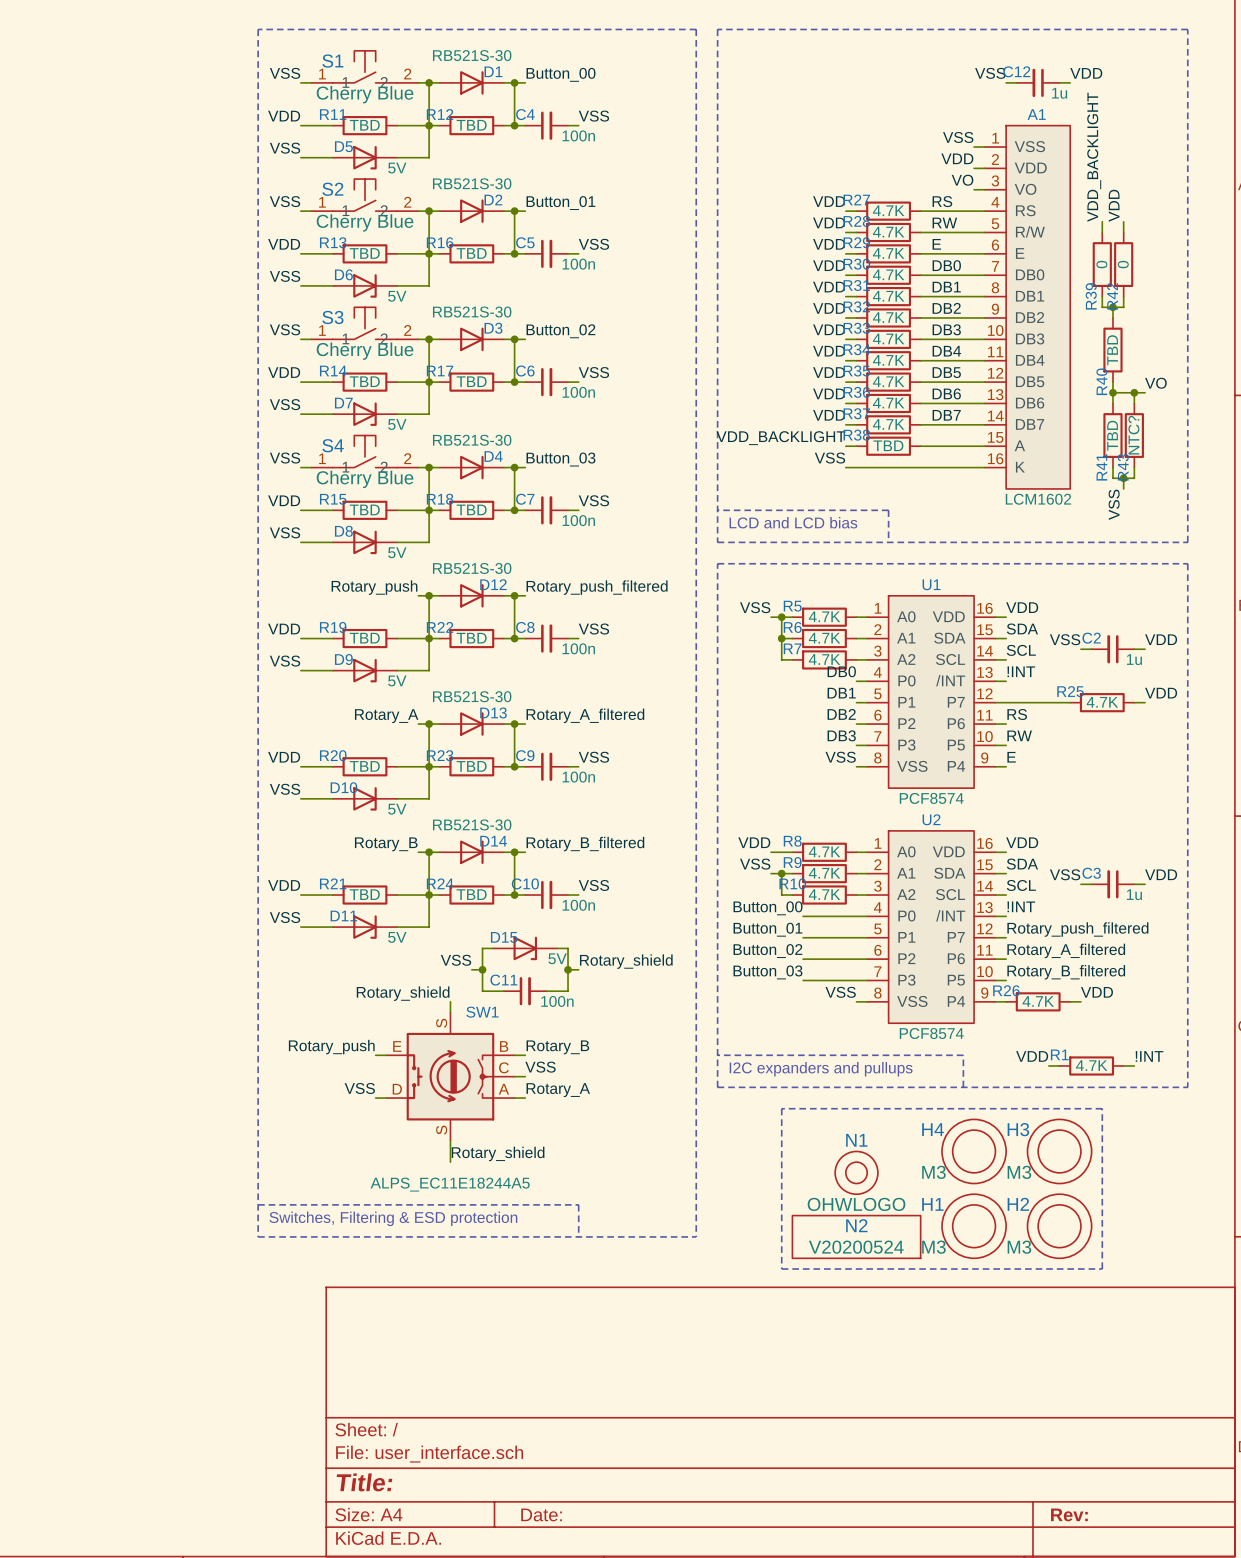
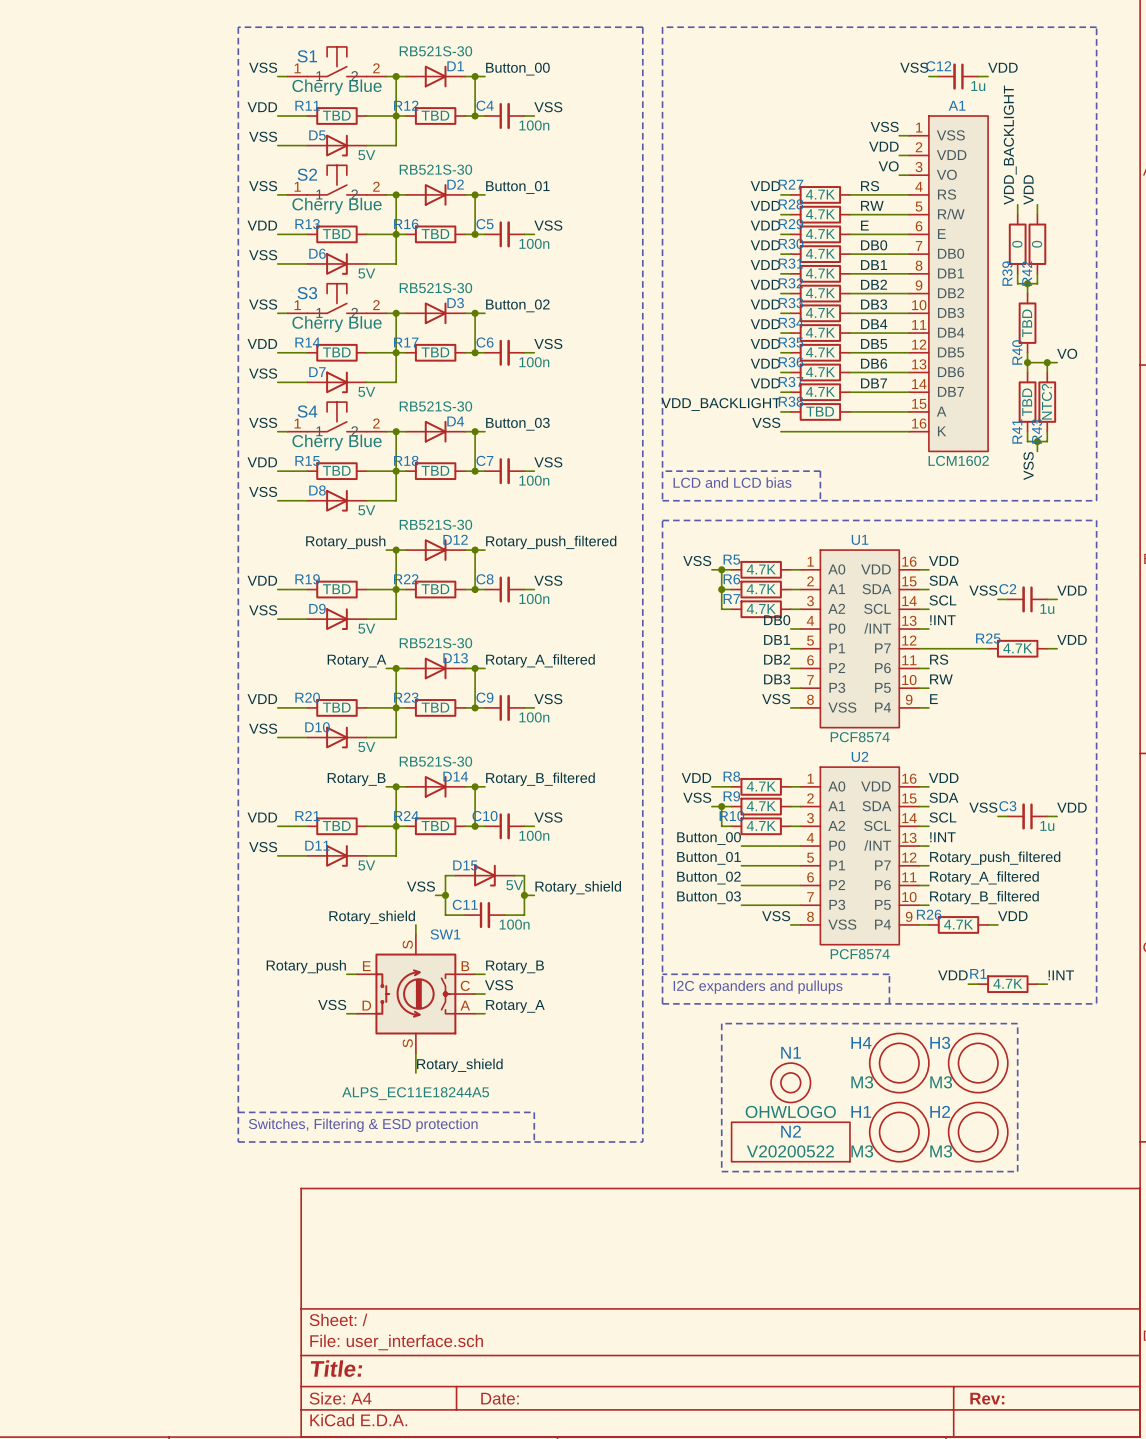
N2 value: V20200524 (856, 1247) -> V20200522 (790, 1151)

